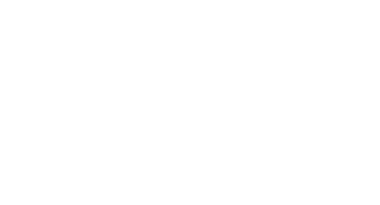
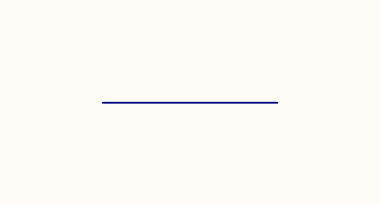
wire: none -> (102, 102) (277, 102)

